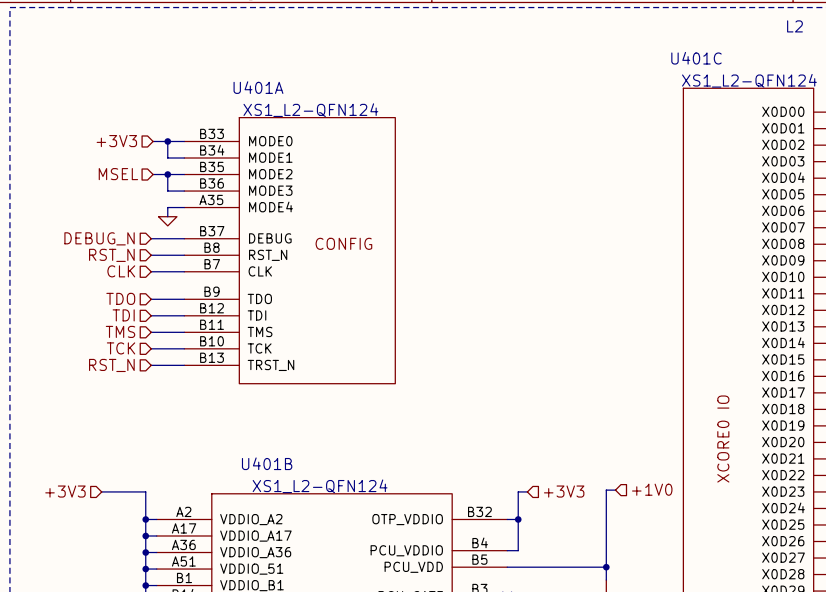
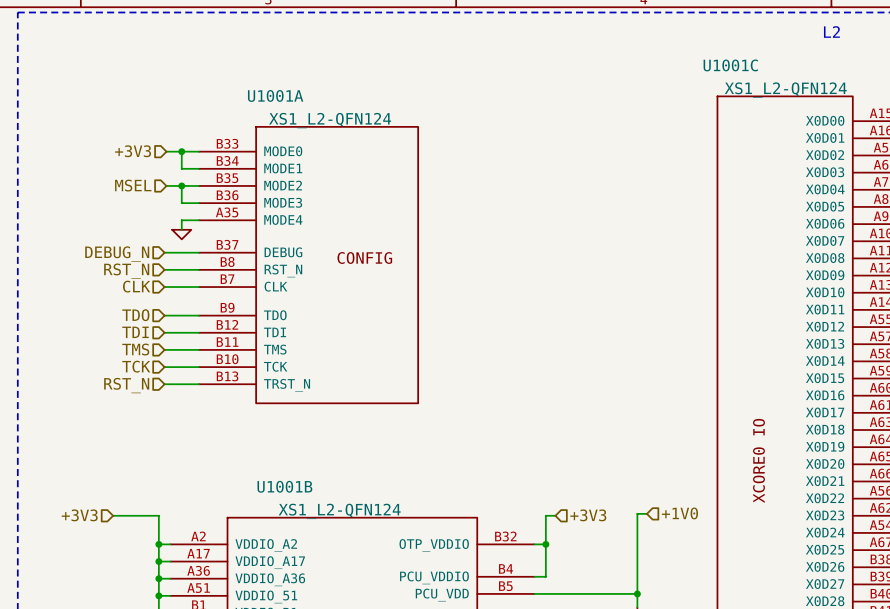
U401C name: U401C (696, 58) -> U1001C (730, 65)
U401A name: U401A (258, 87) -> U1001A (275, 95)
U401B name: U401B (267, 463) -> U1001B (284, 486)

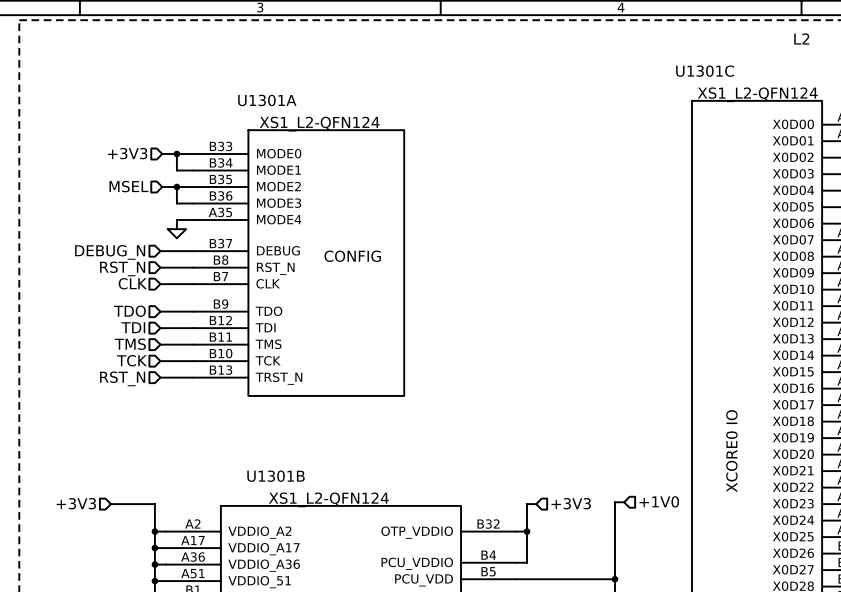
U1001C name: U1001C (730, 65) -> U1301C (705, 71)
U1001A name: U1001A (275, 95) -> U1301A (267, 100)
U1001B name: U1001B (284, 486) -> U1301B (276, 476)

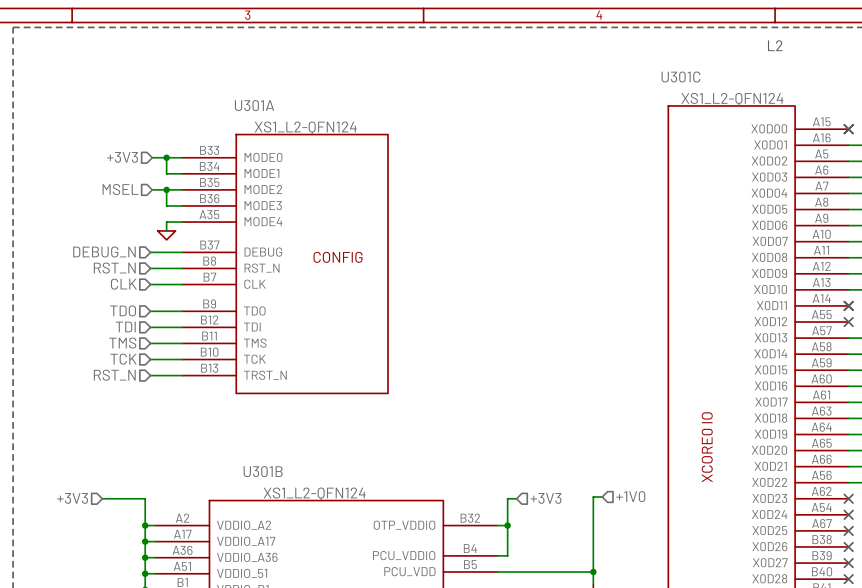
U1301C name: U1301C (705, 71) -> U301C (680, 77)
U1301A name: U1301A (267, 100) -> U301A (254, 105)
U1301B name: U1301B (276, 476) -> U301B (263, 471)

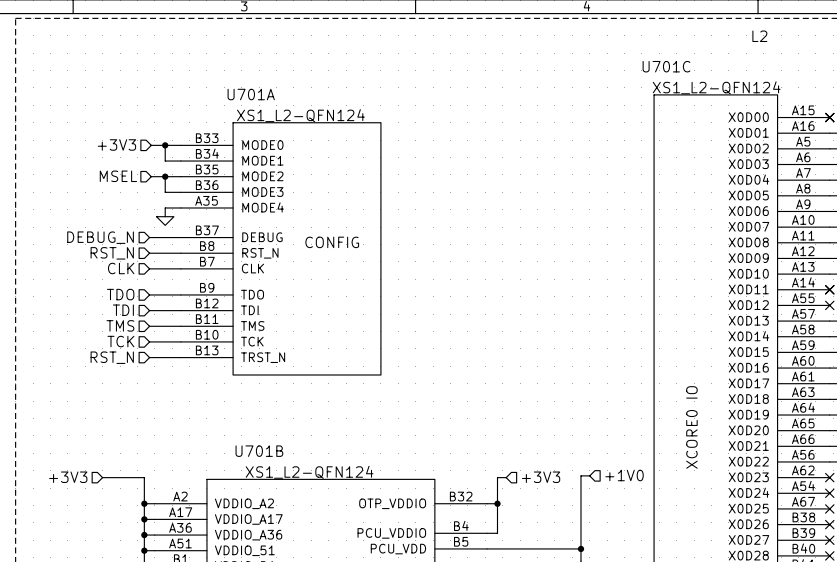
U301C name: U301C (680, 77) -> U701C (666, 66)
U301A name: U301A (254, 105) -> U701A (251, 94)
U301B name: U301B (263, 471) -> U701B (259, 451)

